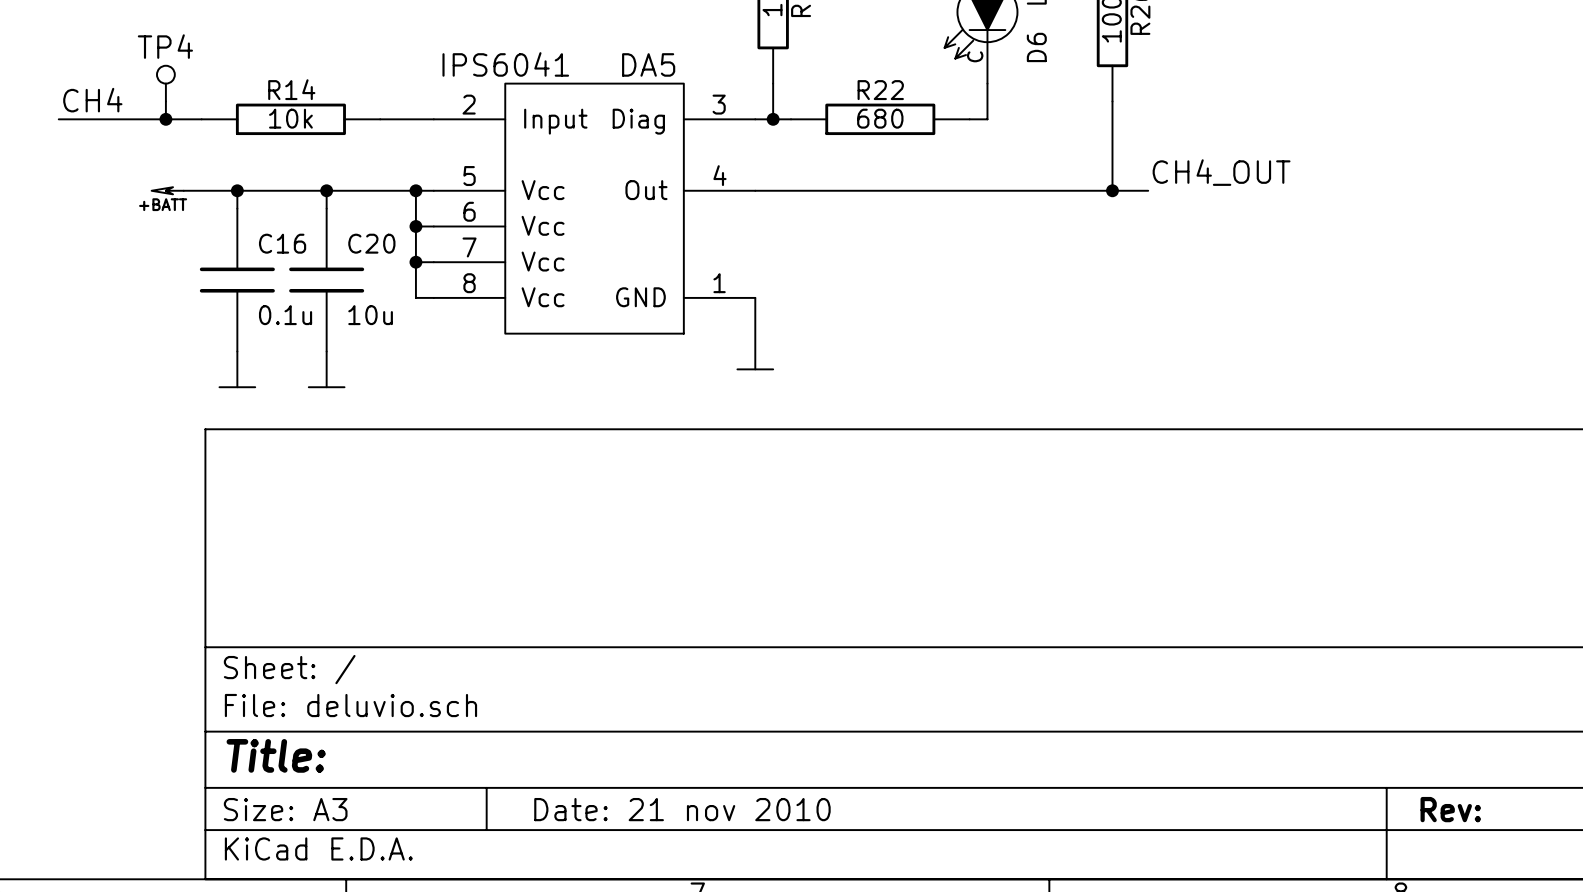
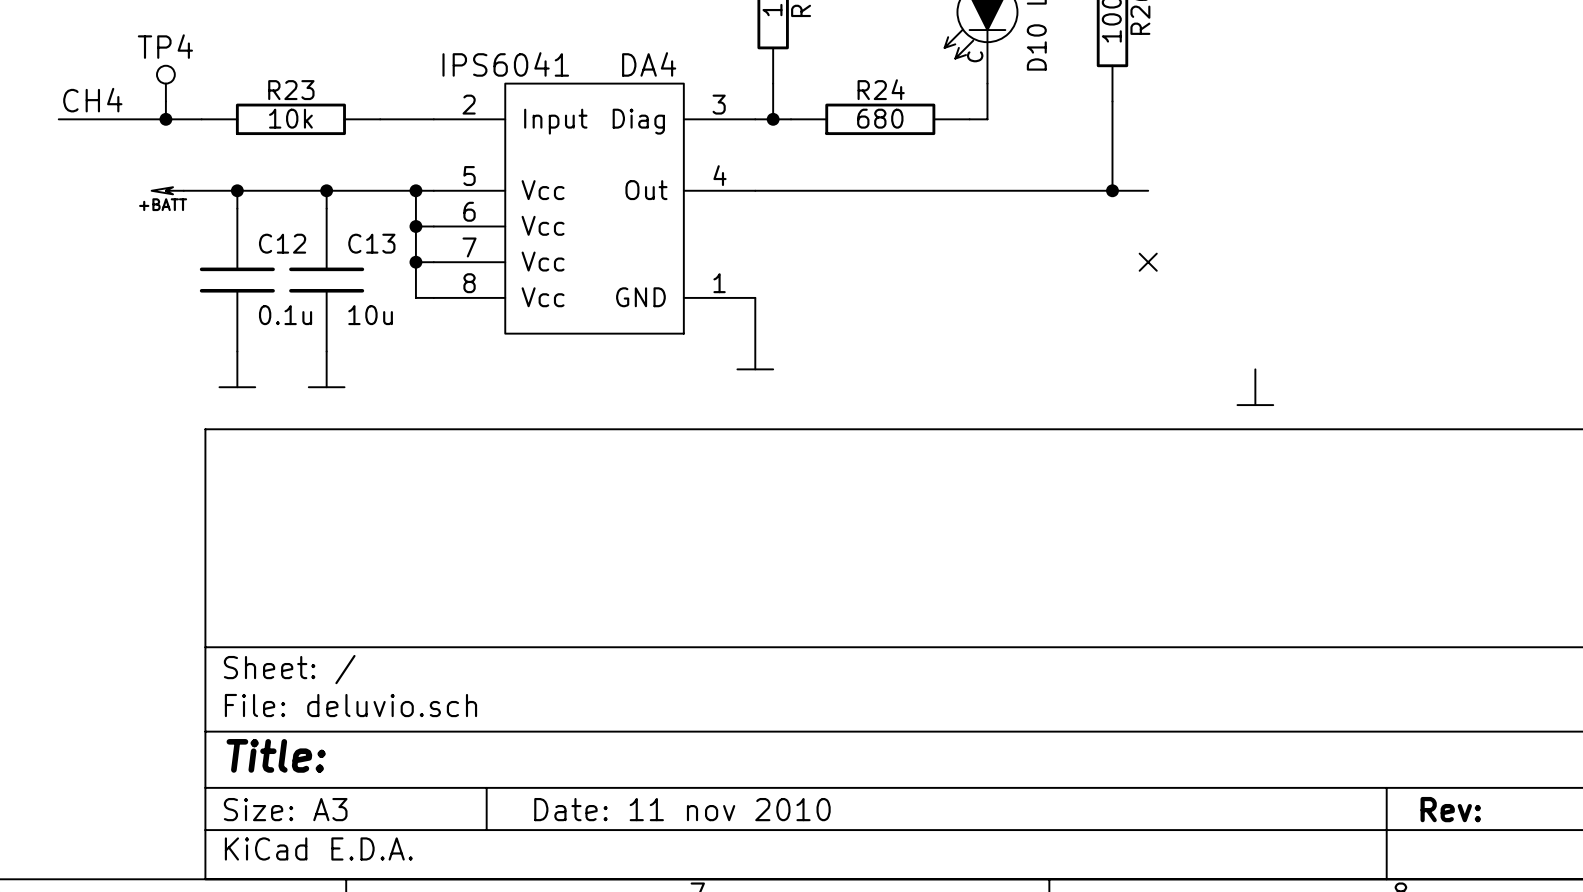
D6 name: D6 (1036, 47) -> D10 (1036, 47)
DA5 name: DA5 (648, 64) -> DA4 (649, 64)
R14 name: R14 (291, 89) -> R23 (291, 90)
R22 name: R22 (880, 90) -> R24 (881, 89)
label: CH4_OUT (1221, 172) -> none
C16 name: C16 (282, 243) -> C12 (282, 243)
C20 name: C20 (371, 243) -> C13 (371, 243)
no-connect mark: none -> (1148, 262)
wire: none -> (1255, 369) (1255, 405)
power symbol: none -> (1255, 405)
title block: Date: 21 nov 2010 (682, 809) -> Date: 11 nov 2010 (682, 809)

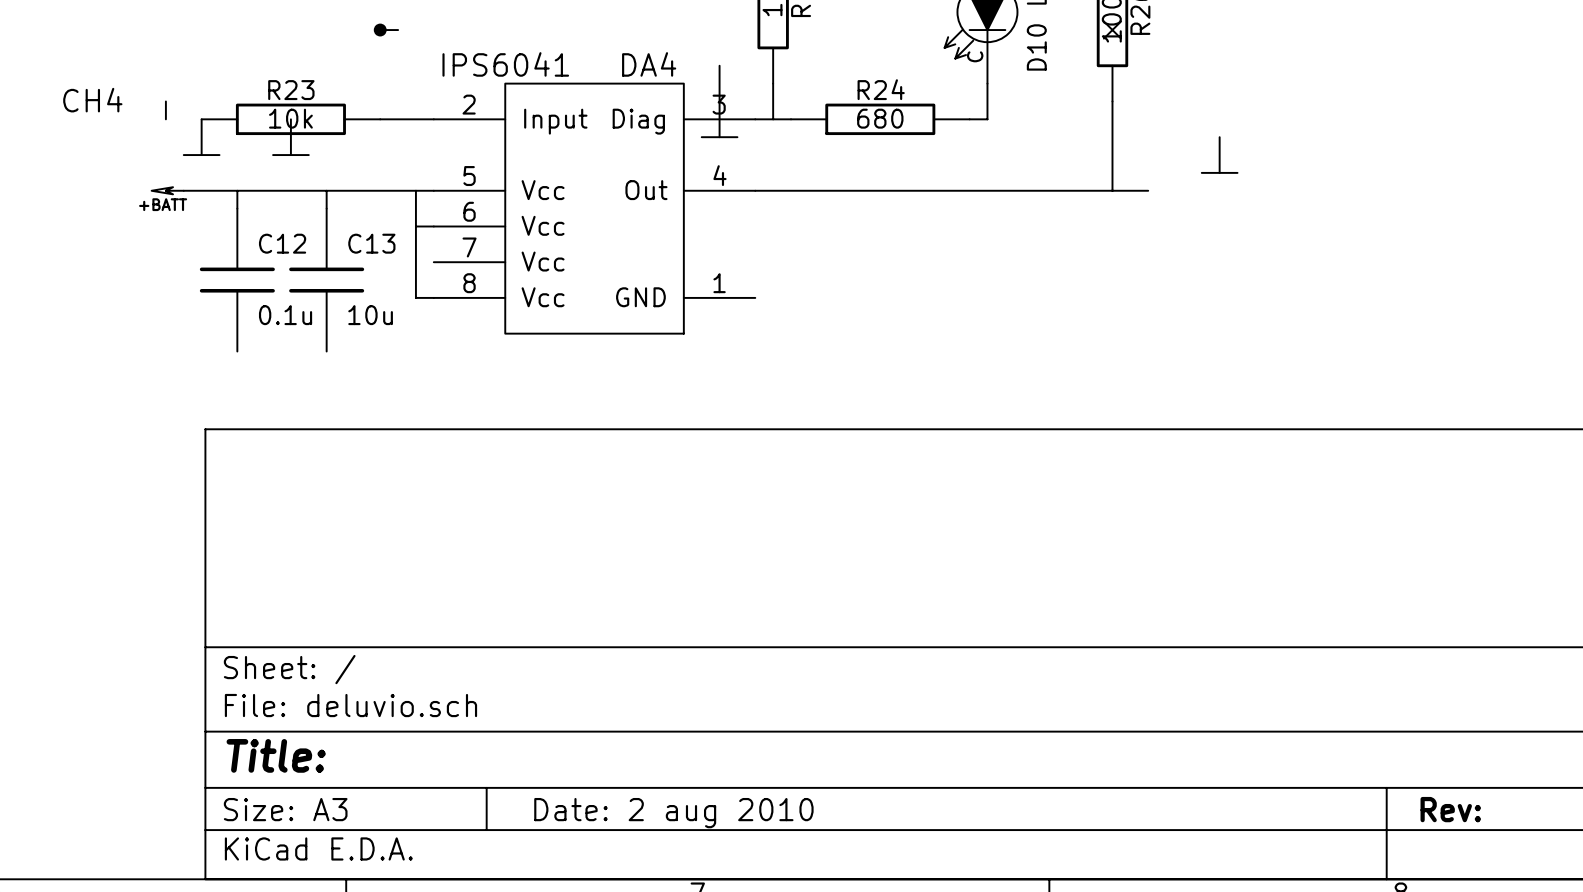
junction: none -> (380, 30)
no-connect mark: none -> (1112, 30)
TP4: (165, 83) -> none
wire: (58, 119) (201, 119) -> (201, 155) (201, 119)
junction: (165, 119) -> none
junction: (773, 119) -> none
power symbol: none -> (719, 137)
power symbol: none -> (201, 155)
power symbol: none -> (290, 155)
junction: (237, 190) -> none
junction: (326, 190) -> none
junction: (415, 190) -> none
junction: (1112, 190) -> none
junction: (415, 226) -> none
wire: (415, 262) (433, 262) -> (380, 30) (398, 30)
junction: (415, 262) -> none
no-connect mark: (1148, 262) -> none
wire: (755, 297) (755, 369) -> (719, 65) (719, 137)
wire: (237, 351) (237, 387) -> none
wire: (326, 351) (326, 387) -> (290, 119) (290, 155)
power symbol: (755, 369) -> none
wire: (1255, 369) (1255, 405) -> (1219, 137) (1219, 172)
power symbol: (237, 387) -> none
power symbol: (326, 387) -> none
power symbol position: (1255, 405) -> (1219, 172)
title block: Date: 11 nov 2010 (682, 809) -> Date: 2 aug 2010 (673, 813)

